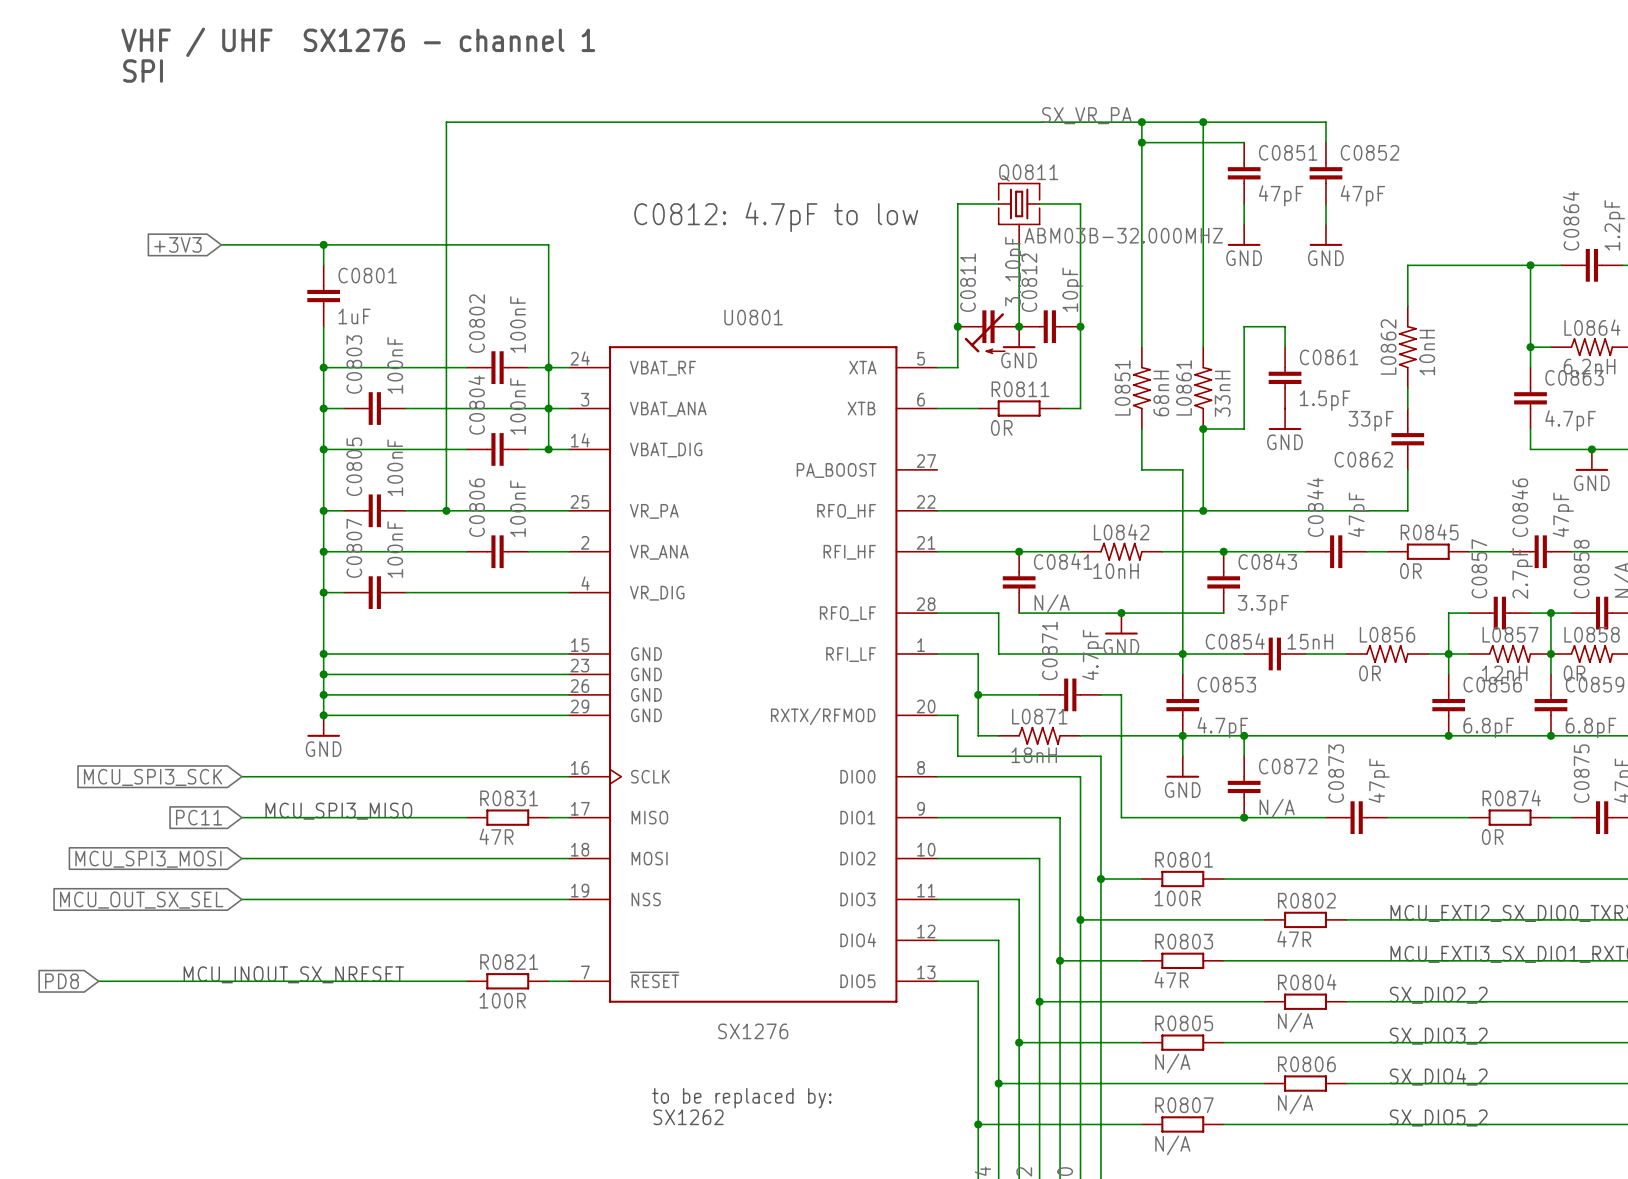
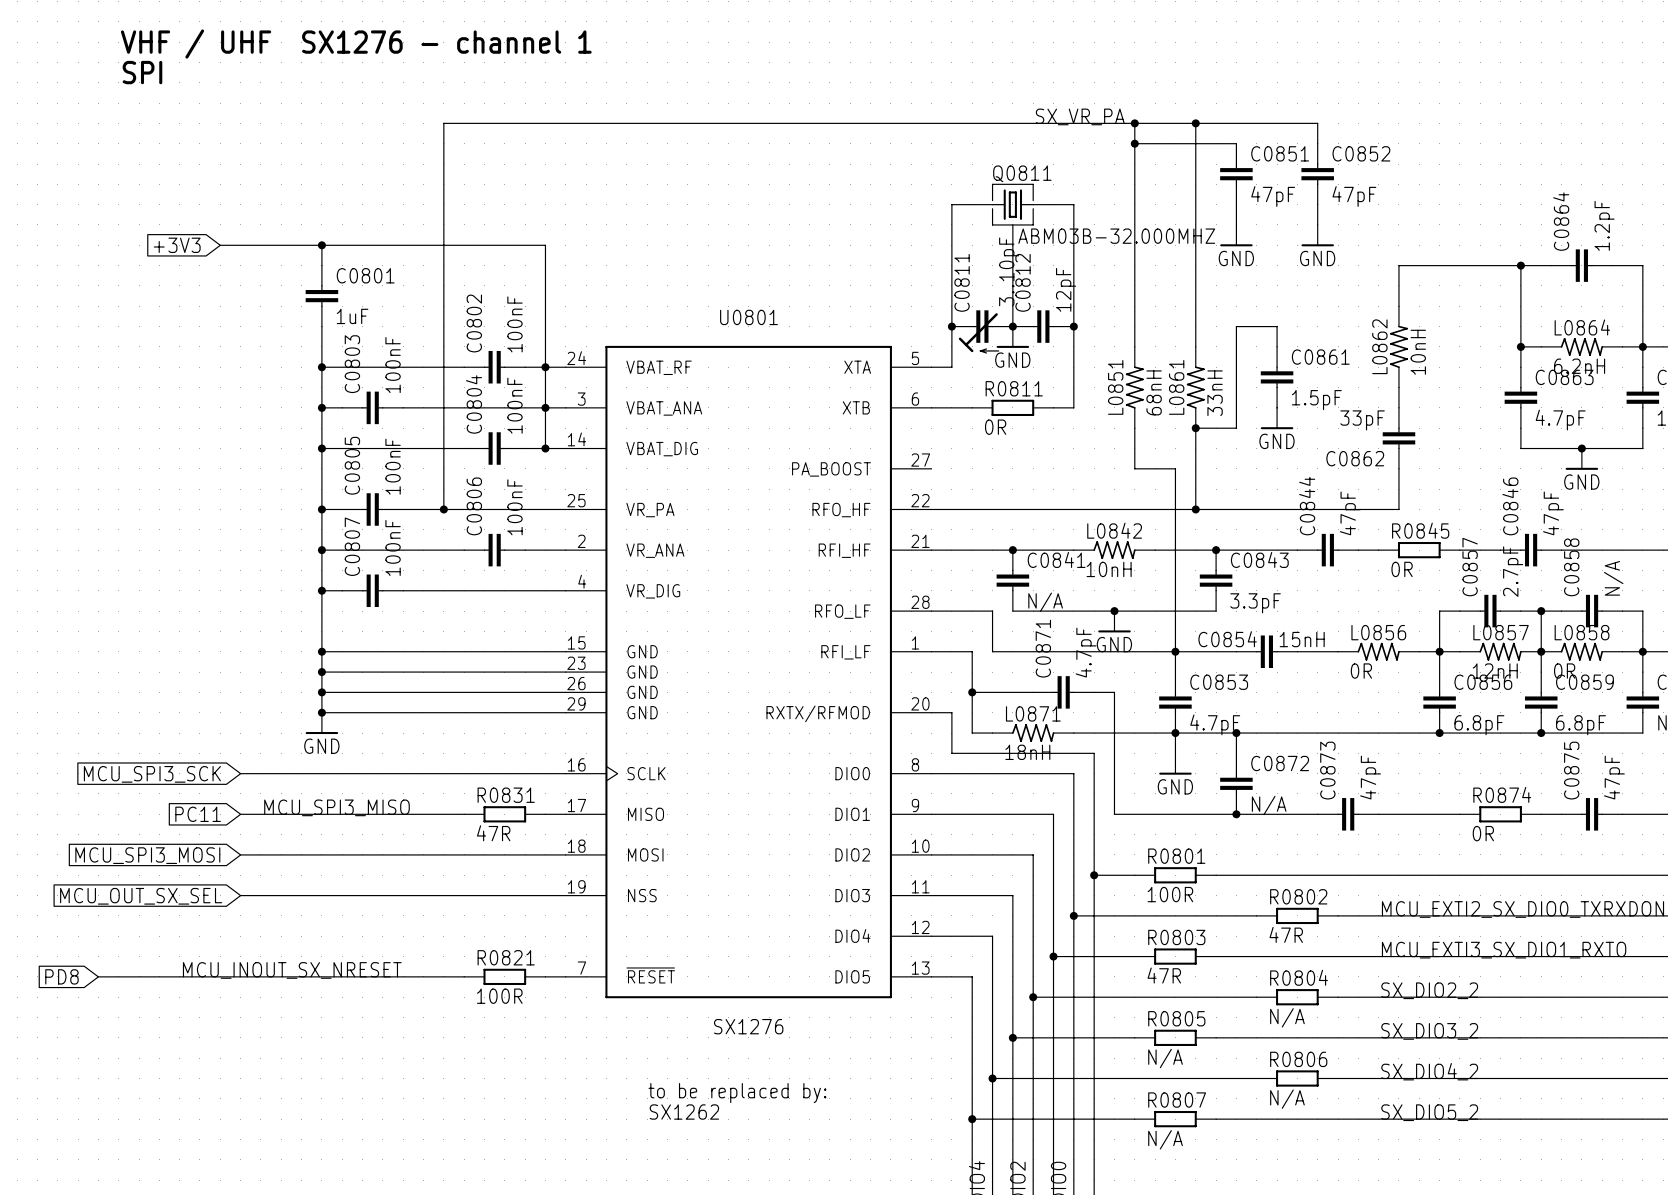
text: C0812: 4.7pF to low (776, 217) -> none
C0812 value: 10pF (1072, 289) -> 12pF (1066, 289)

